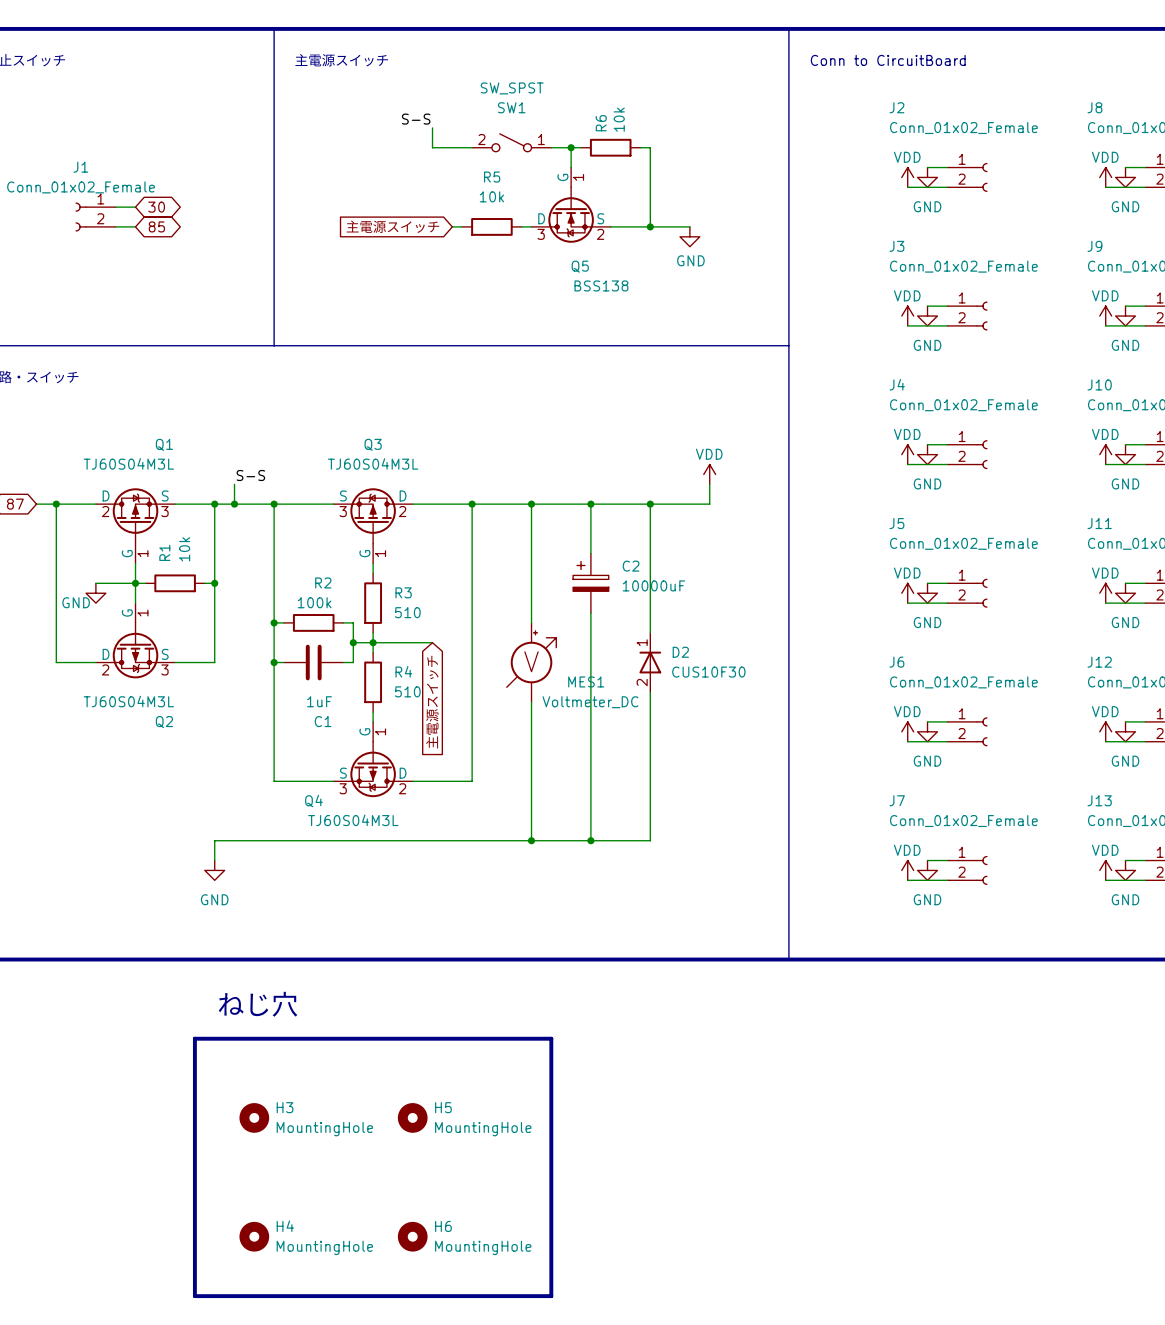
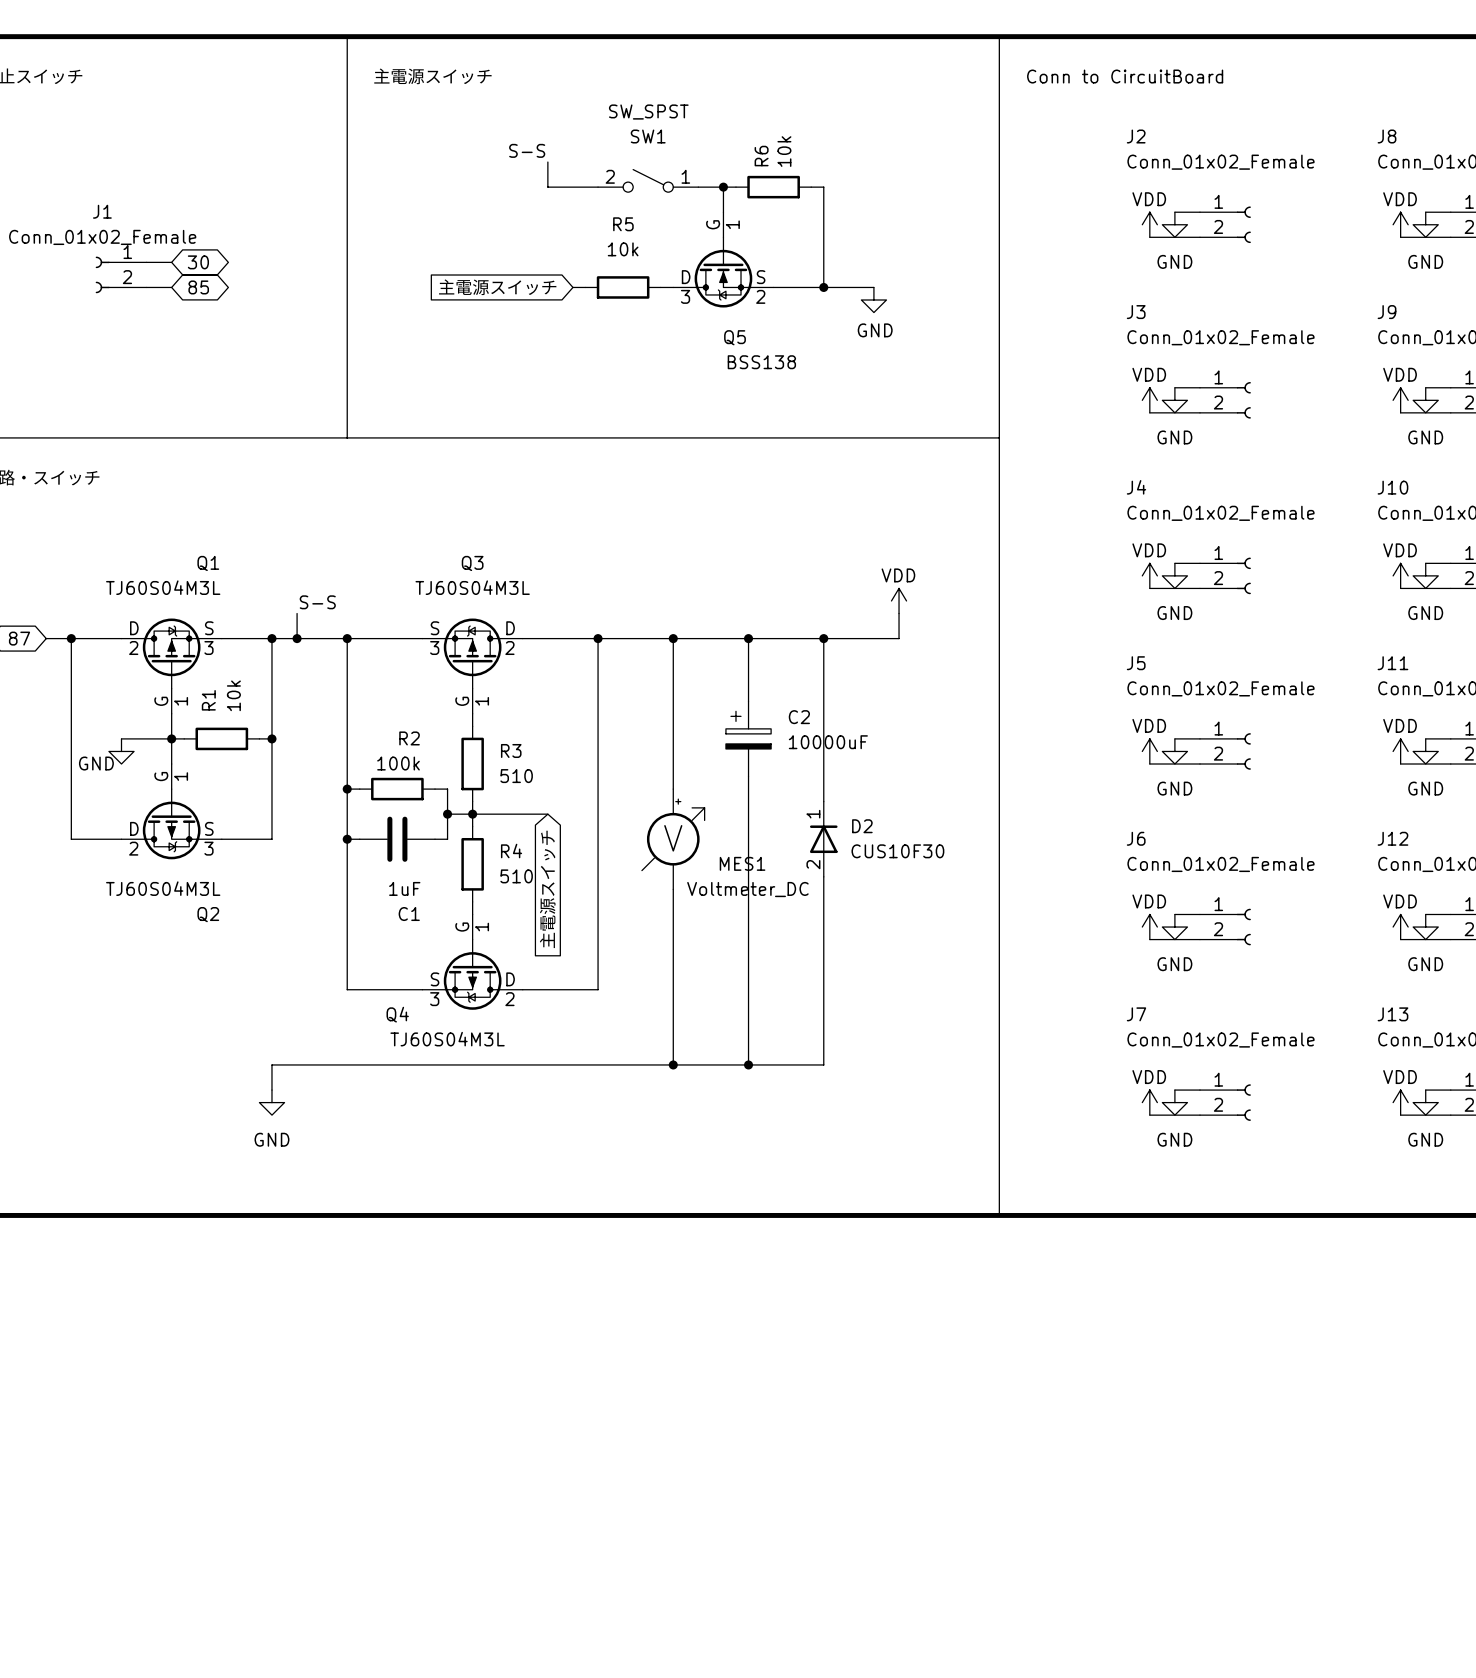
text: ねじ穴 (258, 1004) -> none
line: (194, 1038) (194, 1296) (551, 1296) (551, 1038) (194, 1038) -> none
H3: MountingHole (254, 1117) -> none
H5: MountingHole (412, 1117) -> none
H4: MountingHole (254, 1236) -> none
H6: MountingHole (412, 1236) -> none

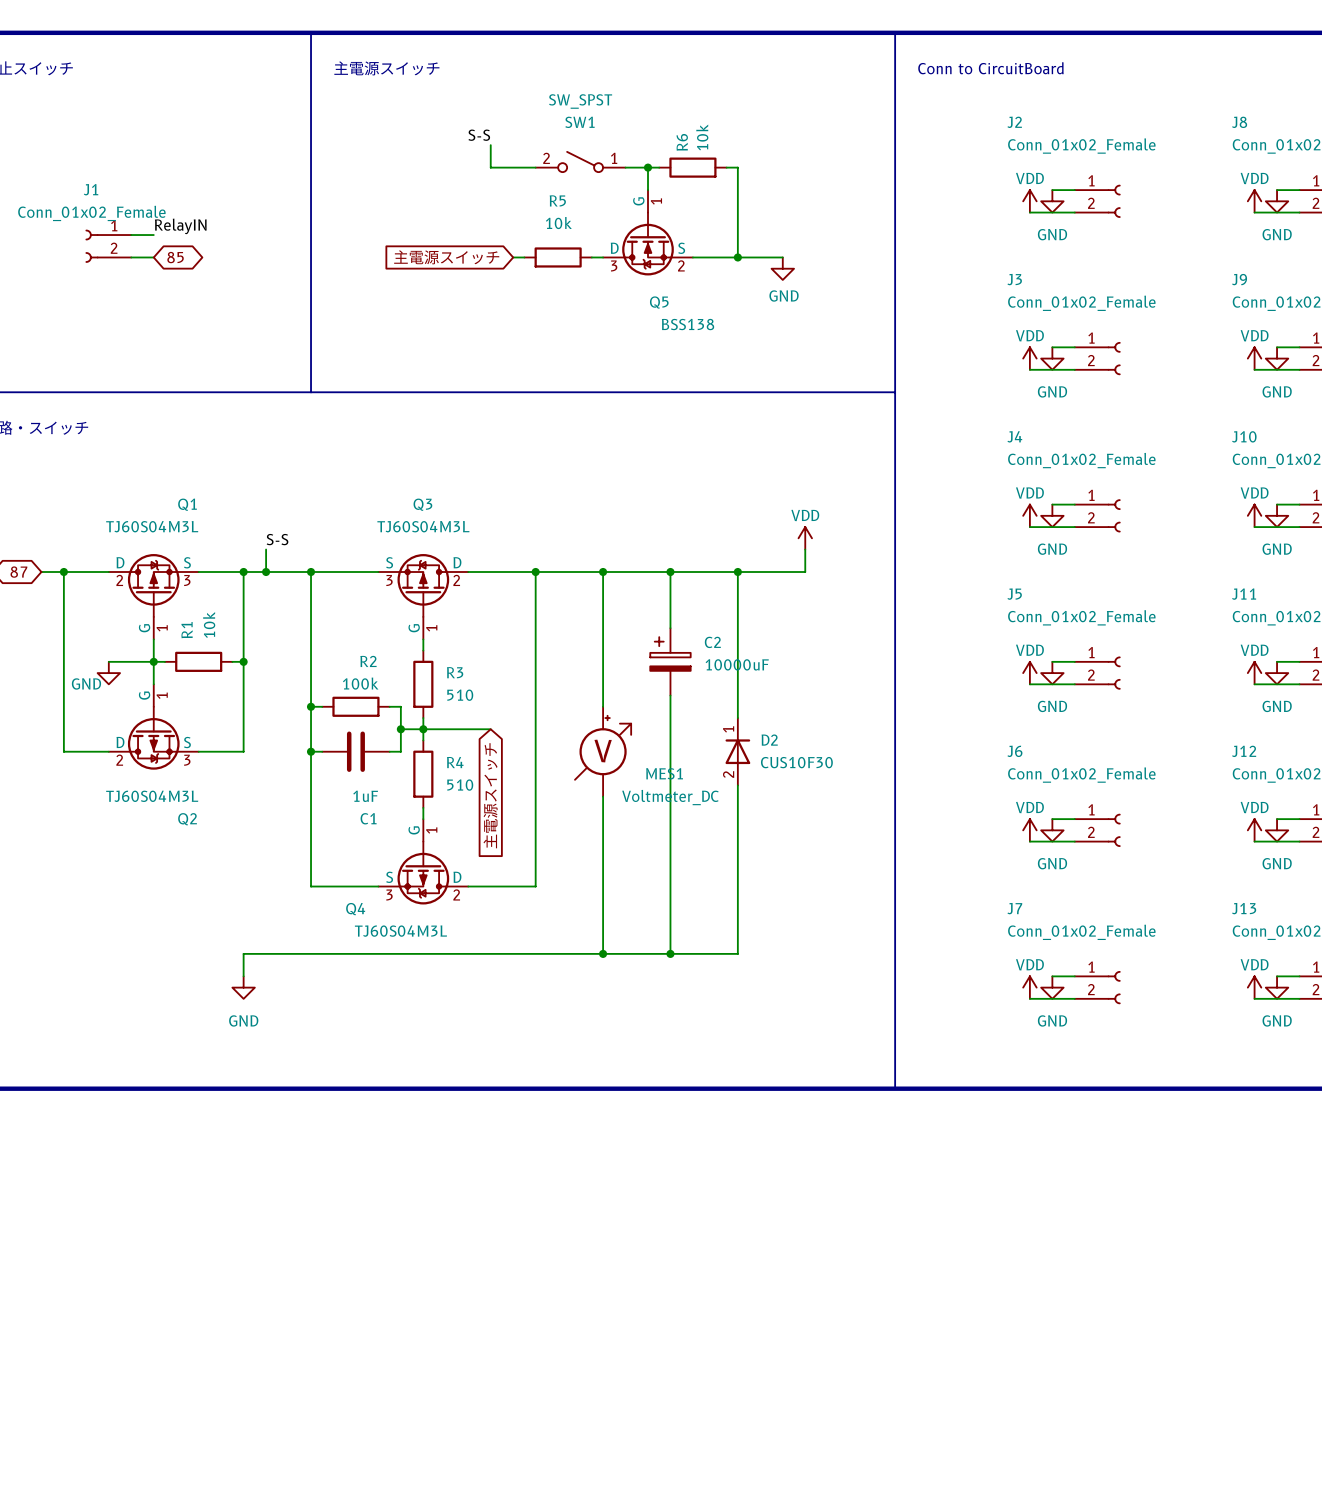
label: none -> RelayIN (180, 226)
global label: 30 (198, 262) -> none

